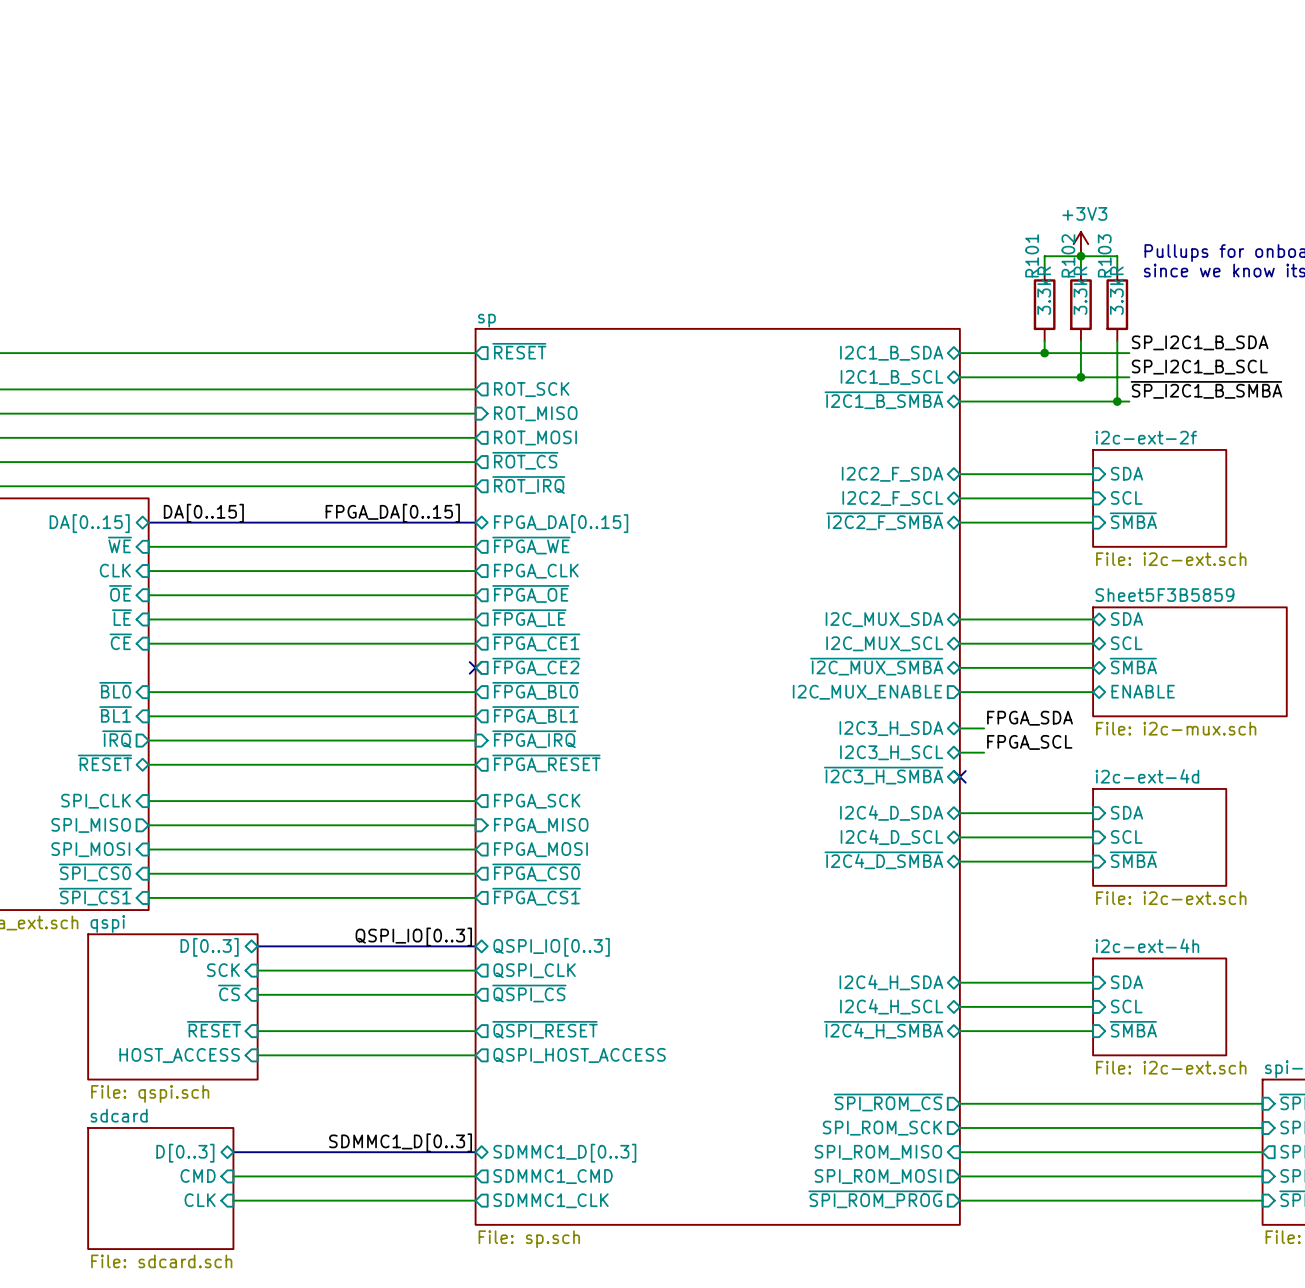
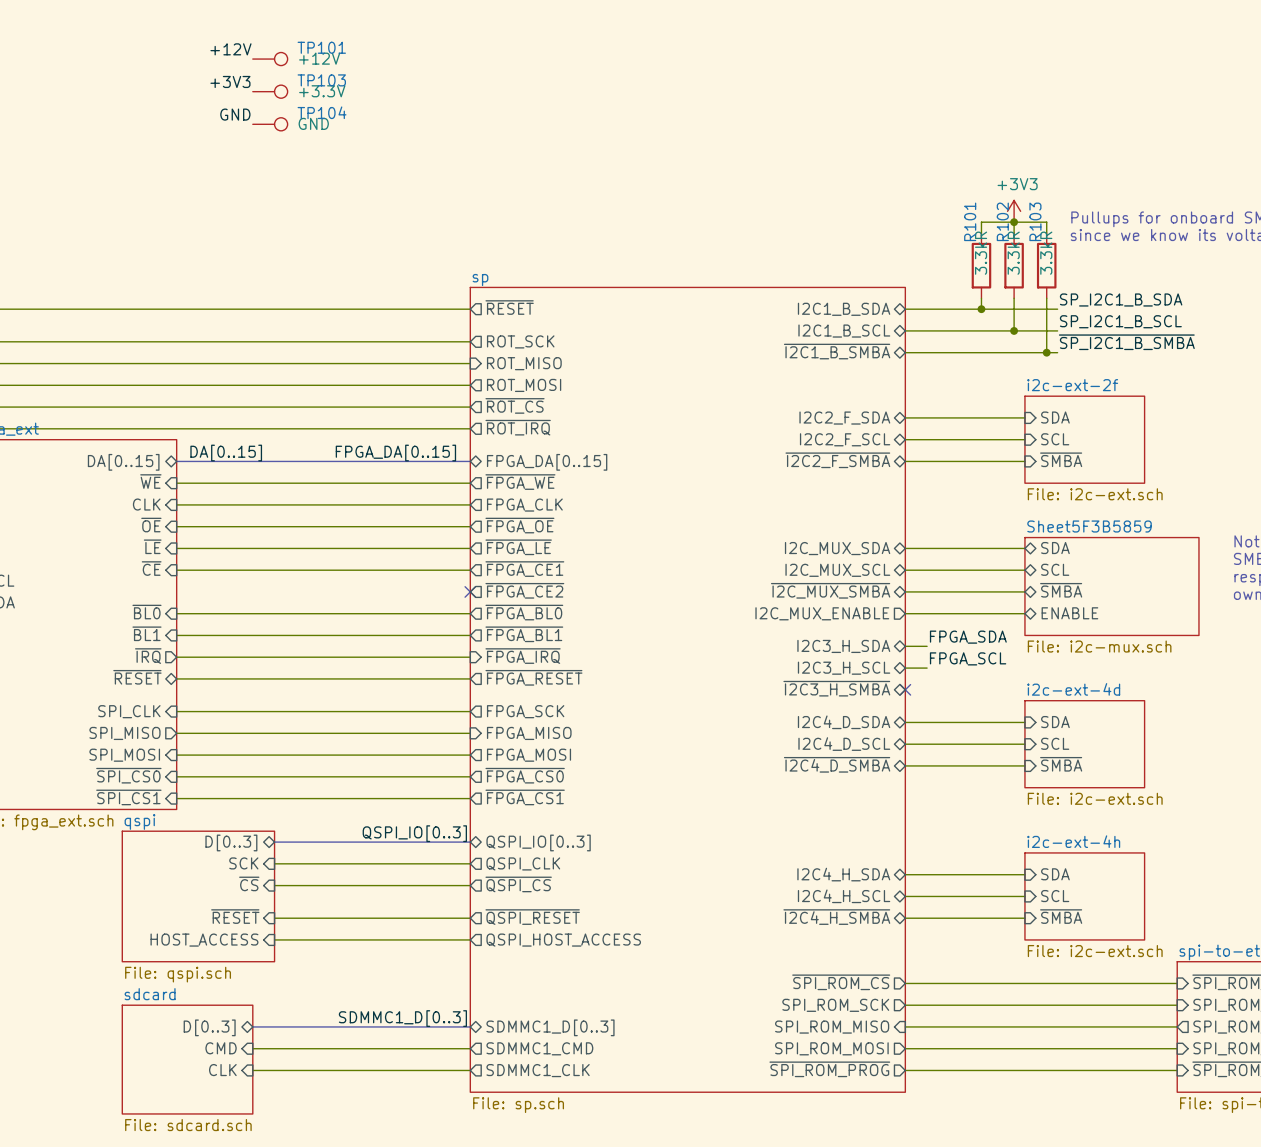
label: none -> +12V (230, 49)
TP101: none -> +12V (270, 59)
label: none -> +3V3 (230, 81)
TP103: none -> +3.3V (270, 91)
label: none -> GND (235, 114)
TP104: none -> GND (270, 124)

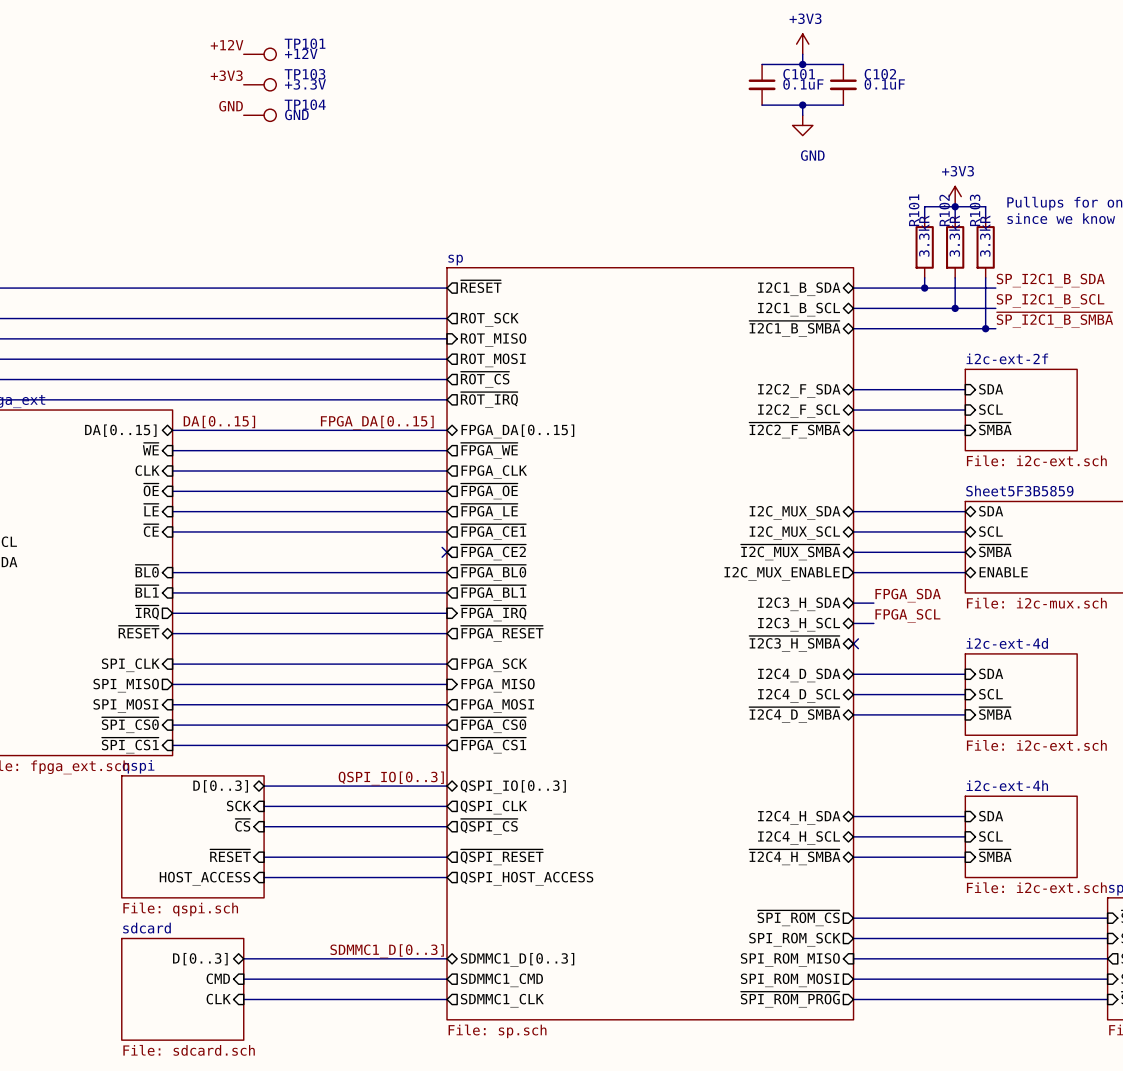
power symbol: none -> +3V3 (802, 44)
wire: none -> (802, 54) (802, 64)
wire: none -> (762, 64) (843, 64)
junction: none -> (802, 64)
C101: none -> 0.1uF (762, 84)
C102: none -> 0.1uF (843, 84)
wire: none -> (762, 105) (843, 105)
wire: none -> (802, 105) (802, 115)
junction: none -> (802, 105)
power symbol: none -> GND (802, 125)

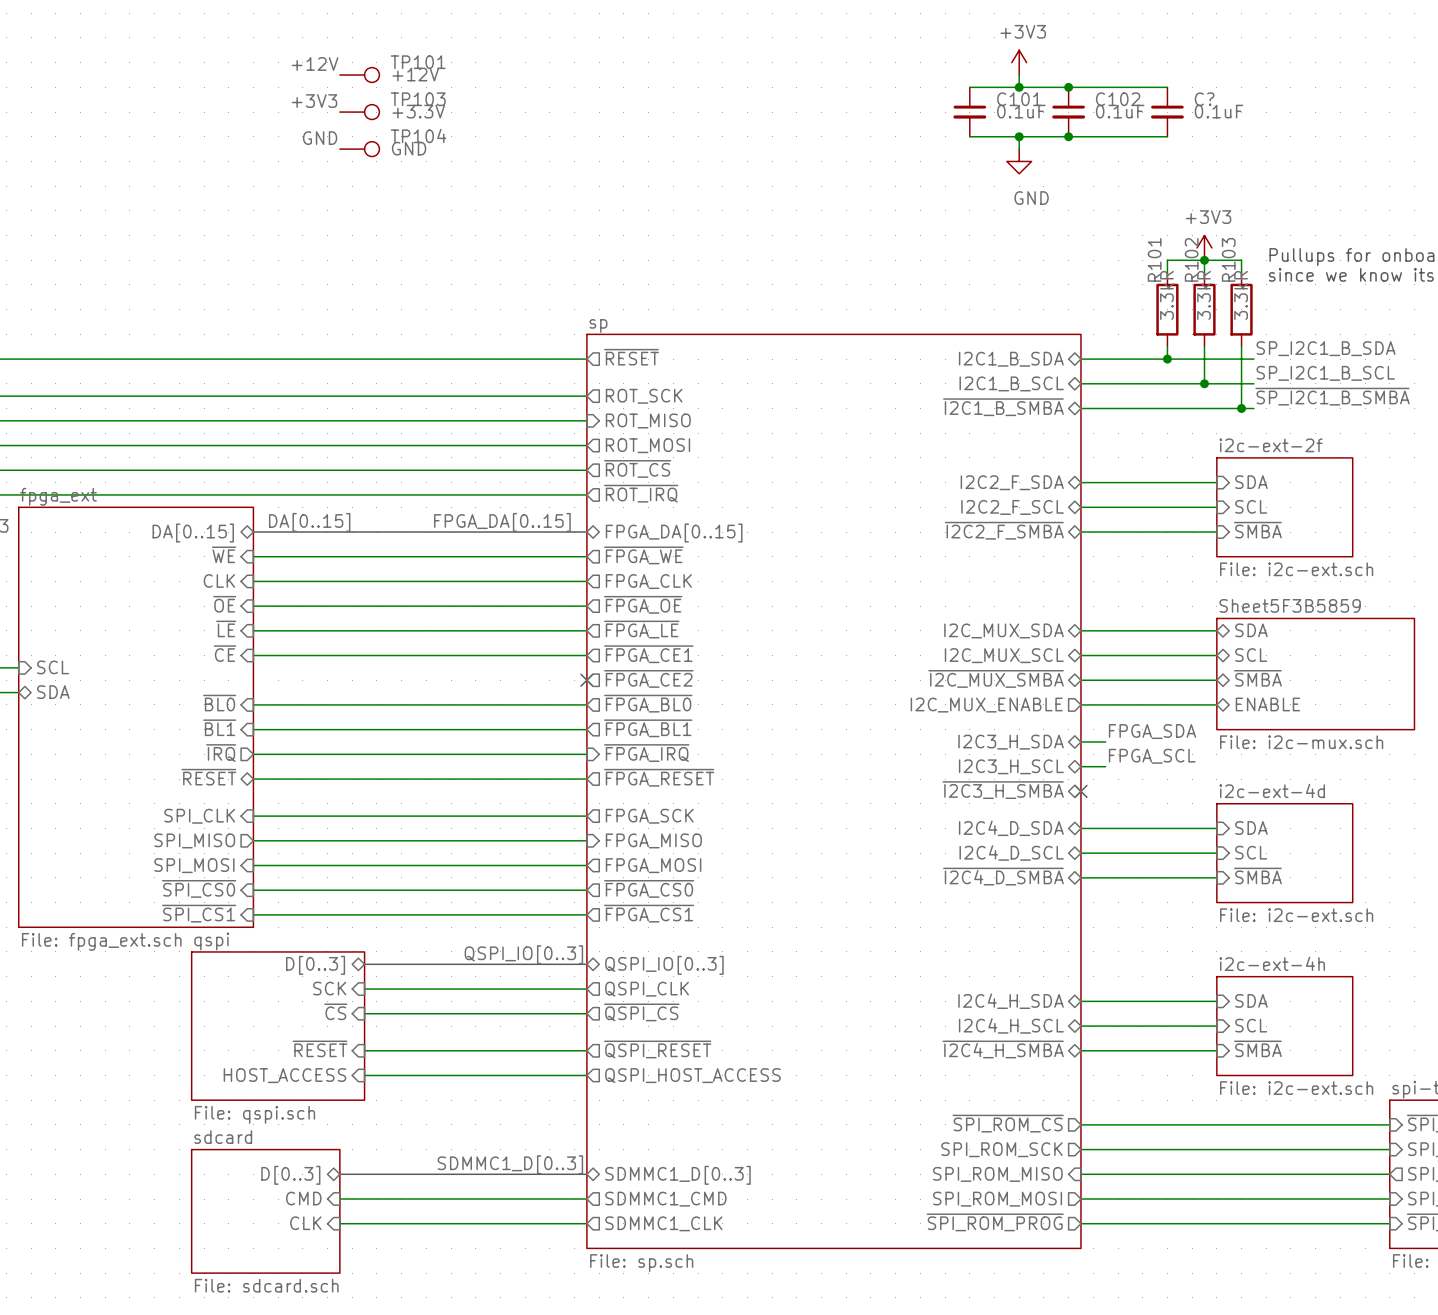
wire: none -> (1068, 87) (1167, 87)
junction: none -> (1068, 87)
C?: none -> 0.1uF (1167, 112)
wire: none -> (1068, 136) (1167, 136)
junction: none -> (1068, 136)

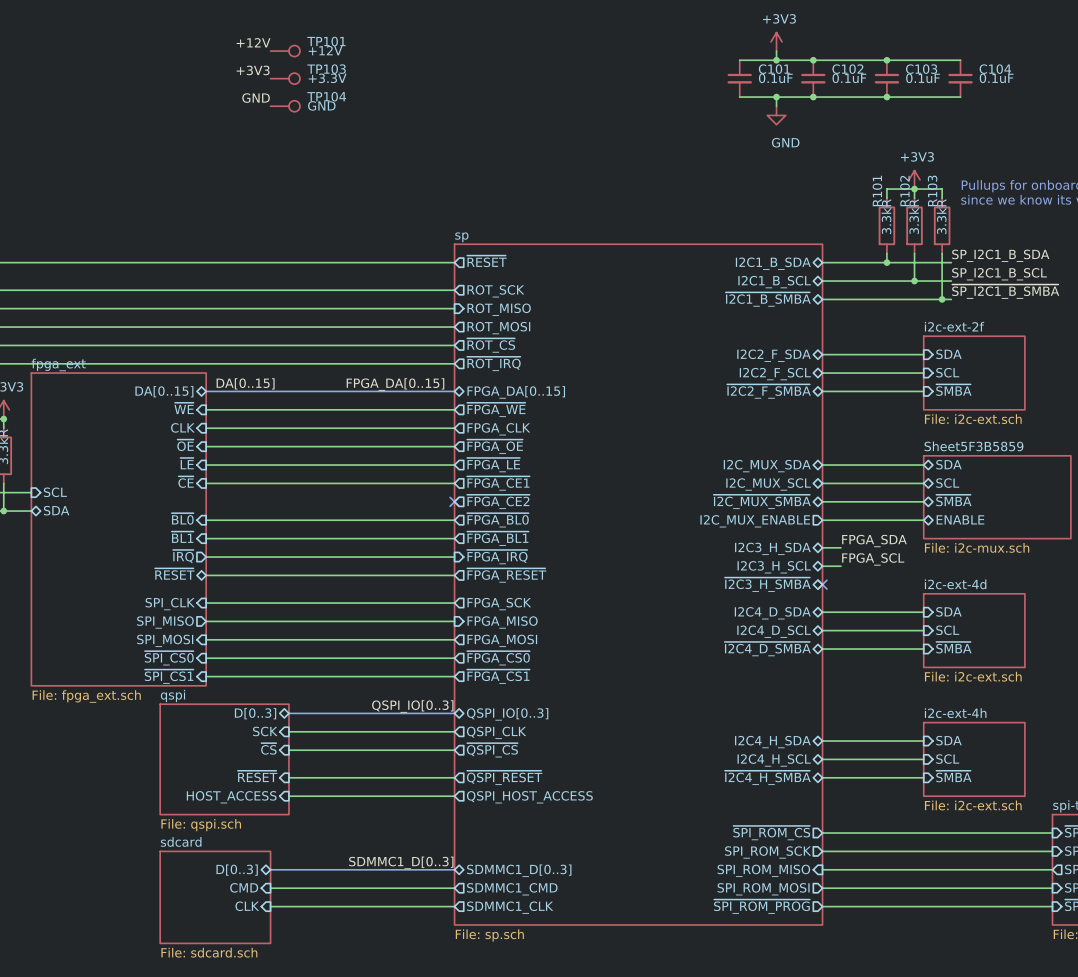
wire: none -> (886, 60) (960, 60)
junction: none -> (886, 60)
C? name: C? (1204, 99) -> C103 (921, 69)
C104: none -> 0.1uF (960, 78)
wire: none -> (886, 97) (960, 97)
junction: none -> (886, 97)

